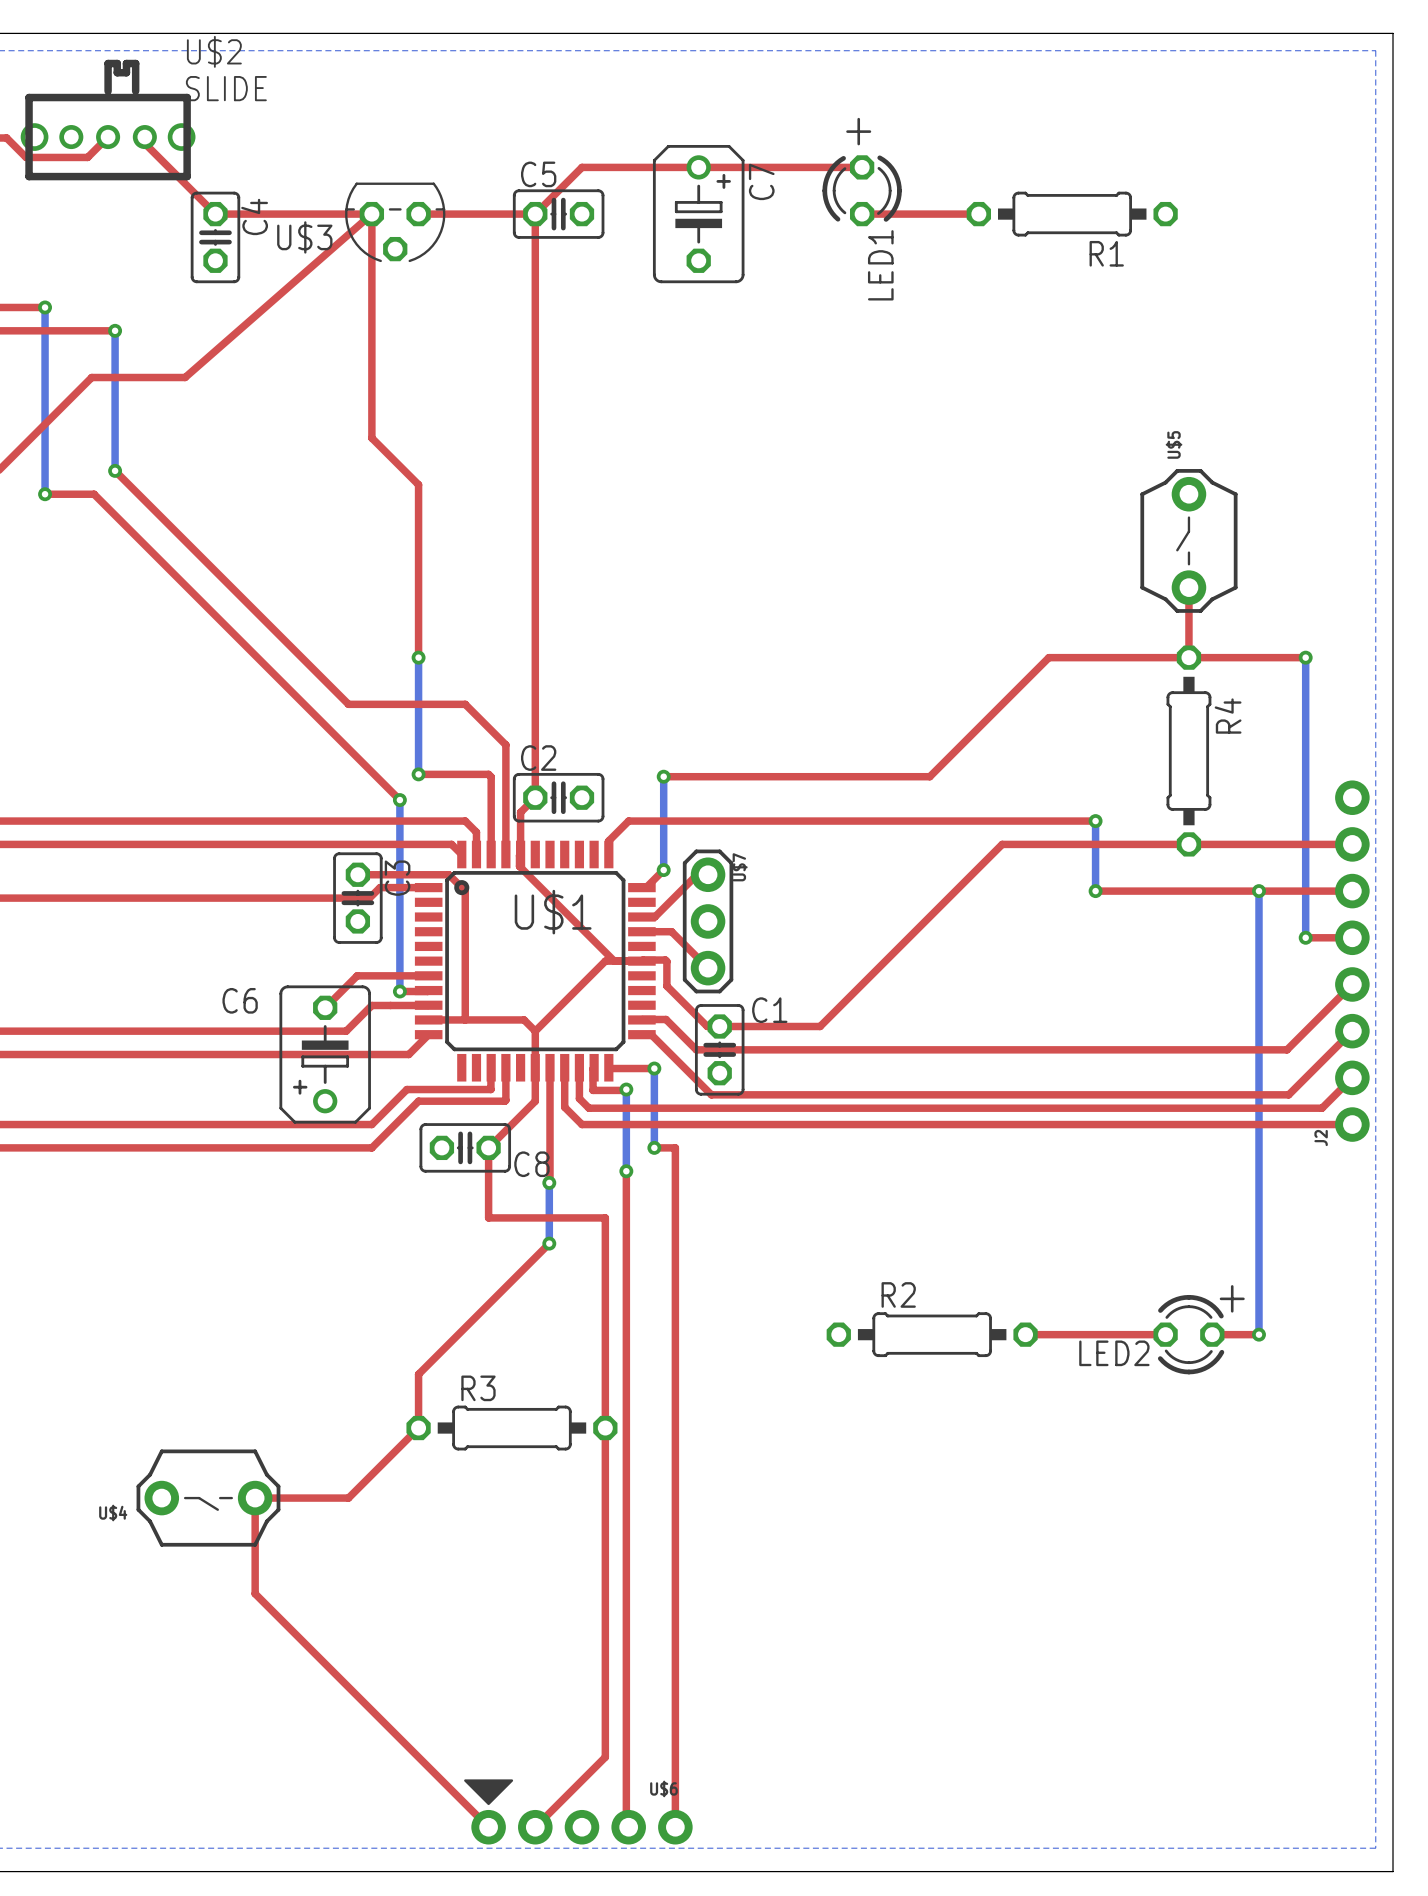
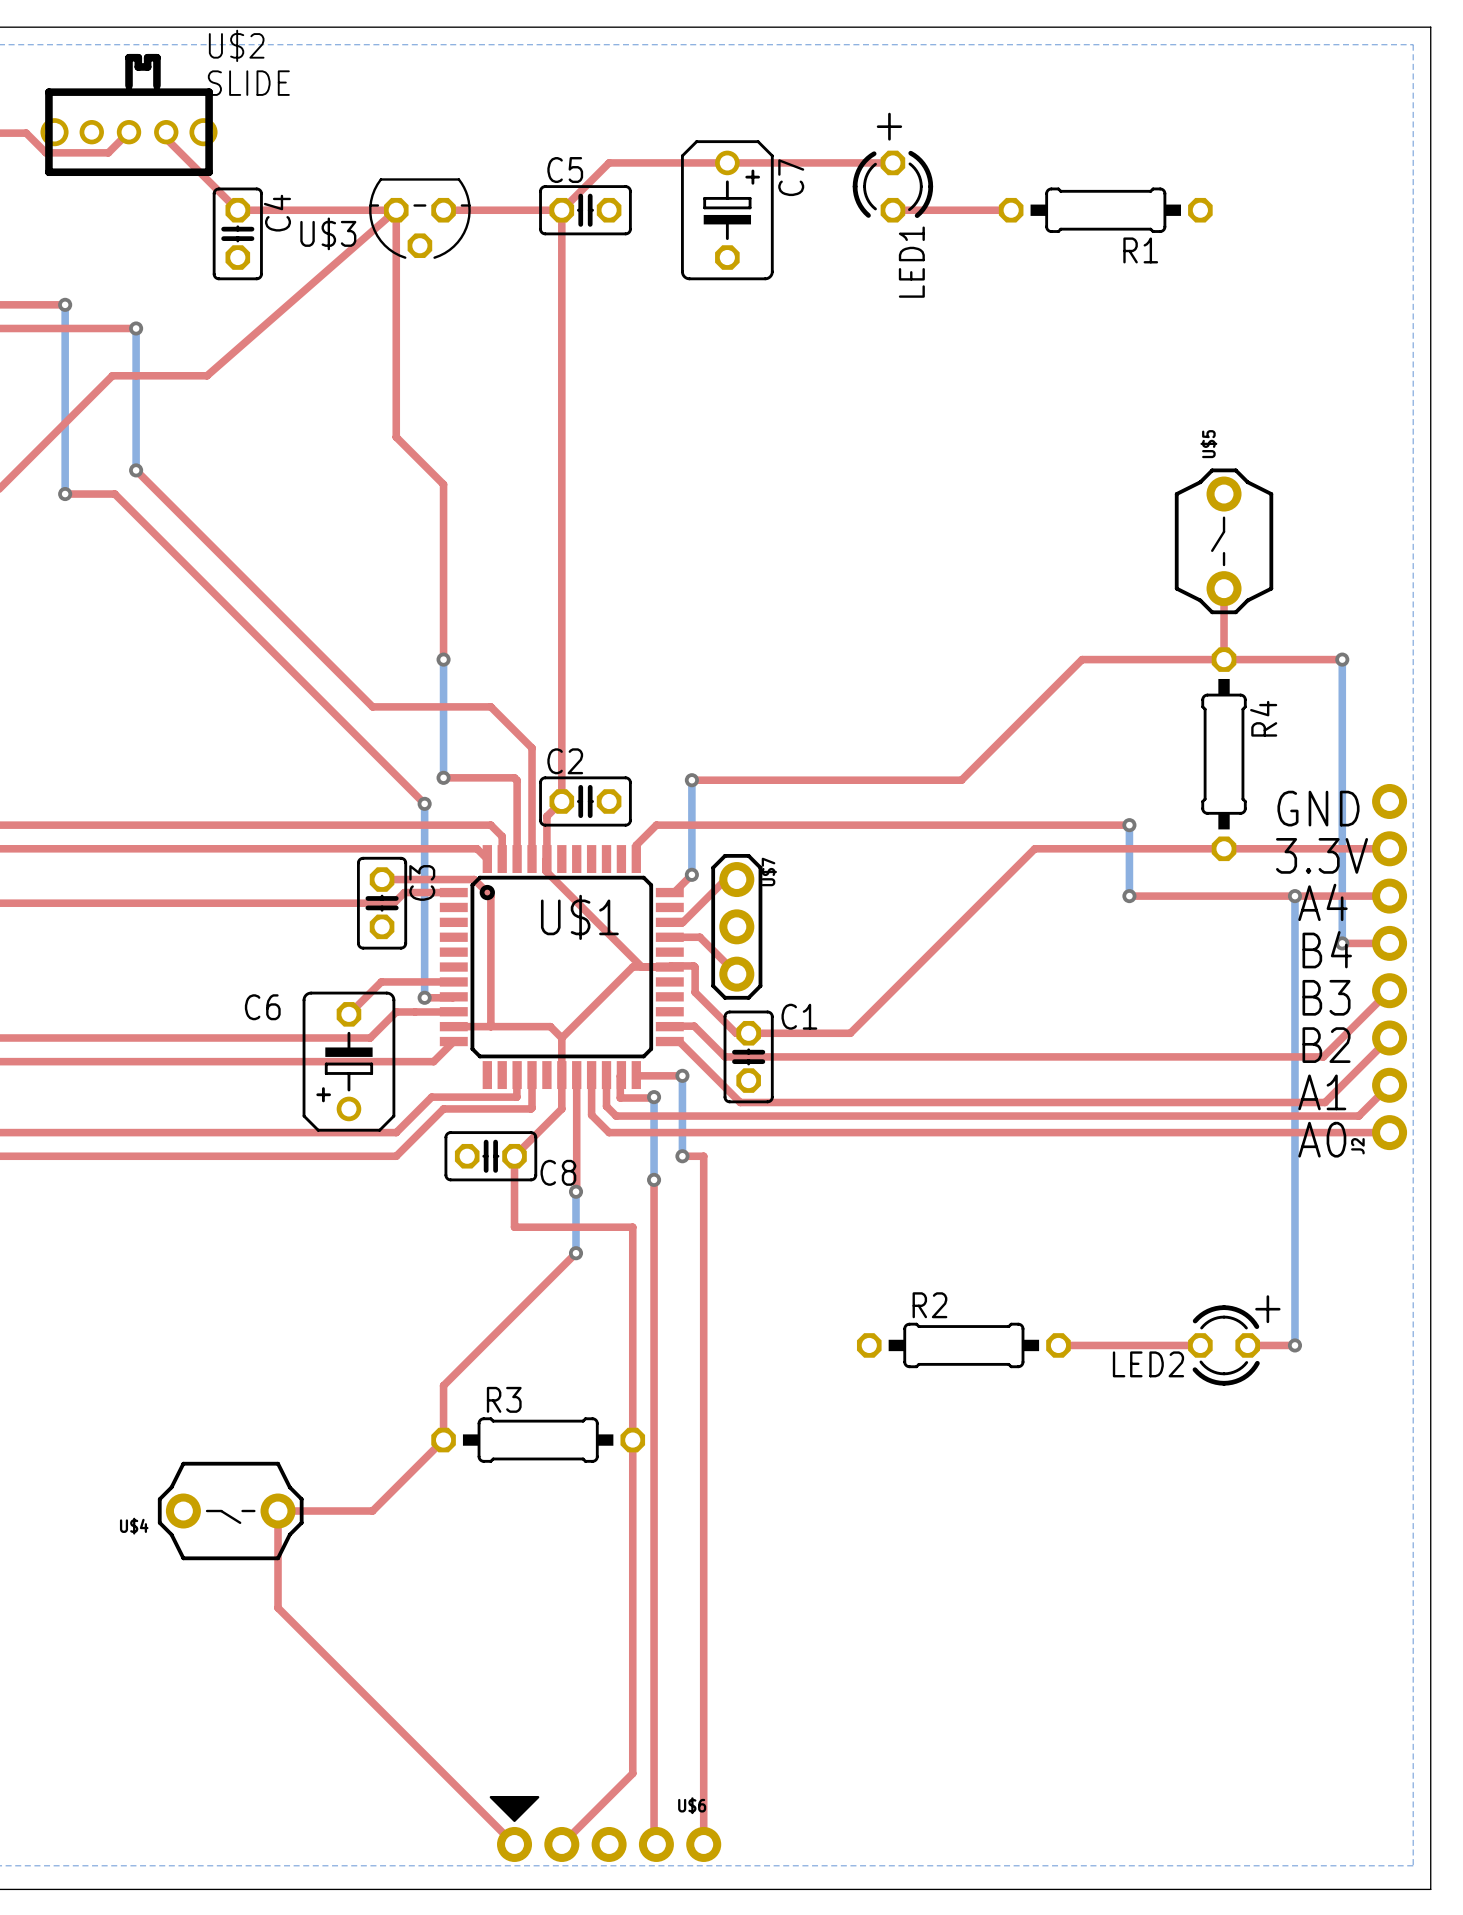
text: none -> GND (1318, 808)
text: none -> 3.3V (1322, 855)
text: none -> A4 (1322, 902)
text: none -> B4 (1327, 949)
text: none -> B3 (1326, 997)
text: none -> B2 (1326, 1045)
text: none -> A1 (1322, 1092)
text: none -> A0 (1322, 1139)

